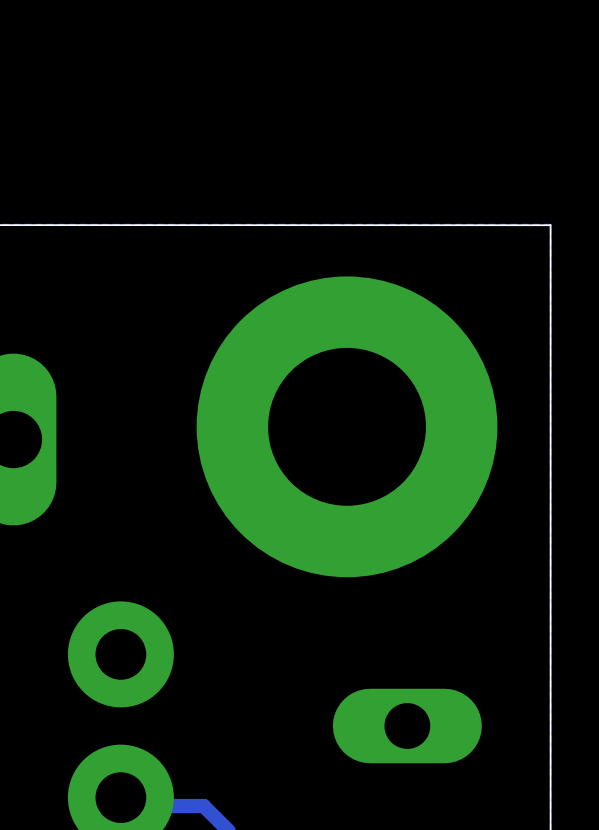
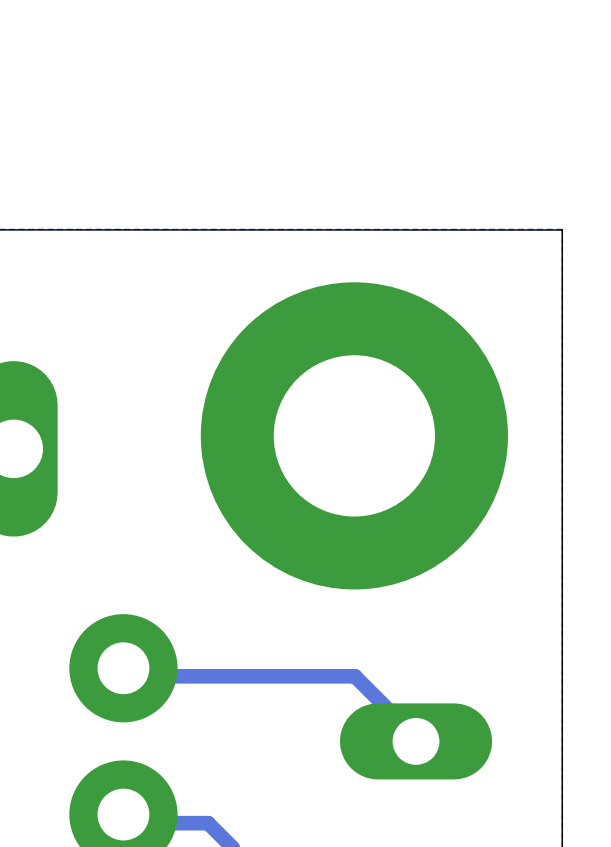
track: none -> (123, 668) (130, 676) (354, 676) (415, 736) (416, 741)

